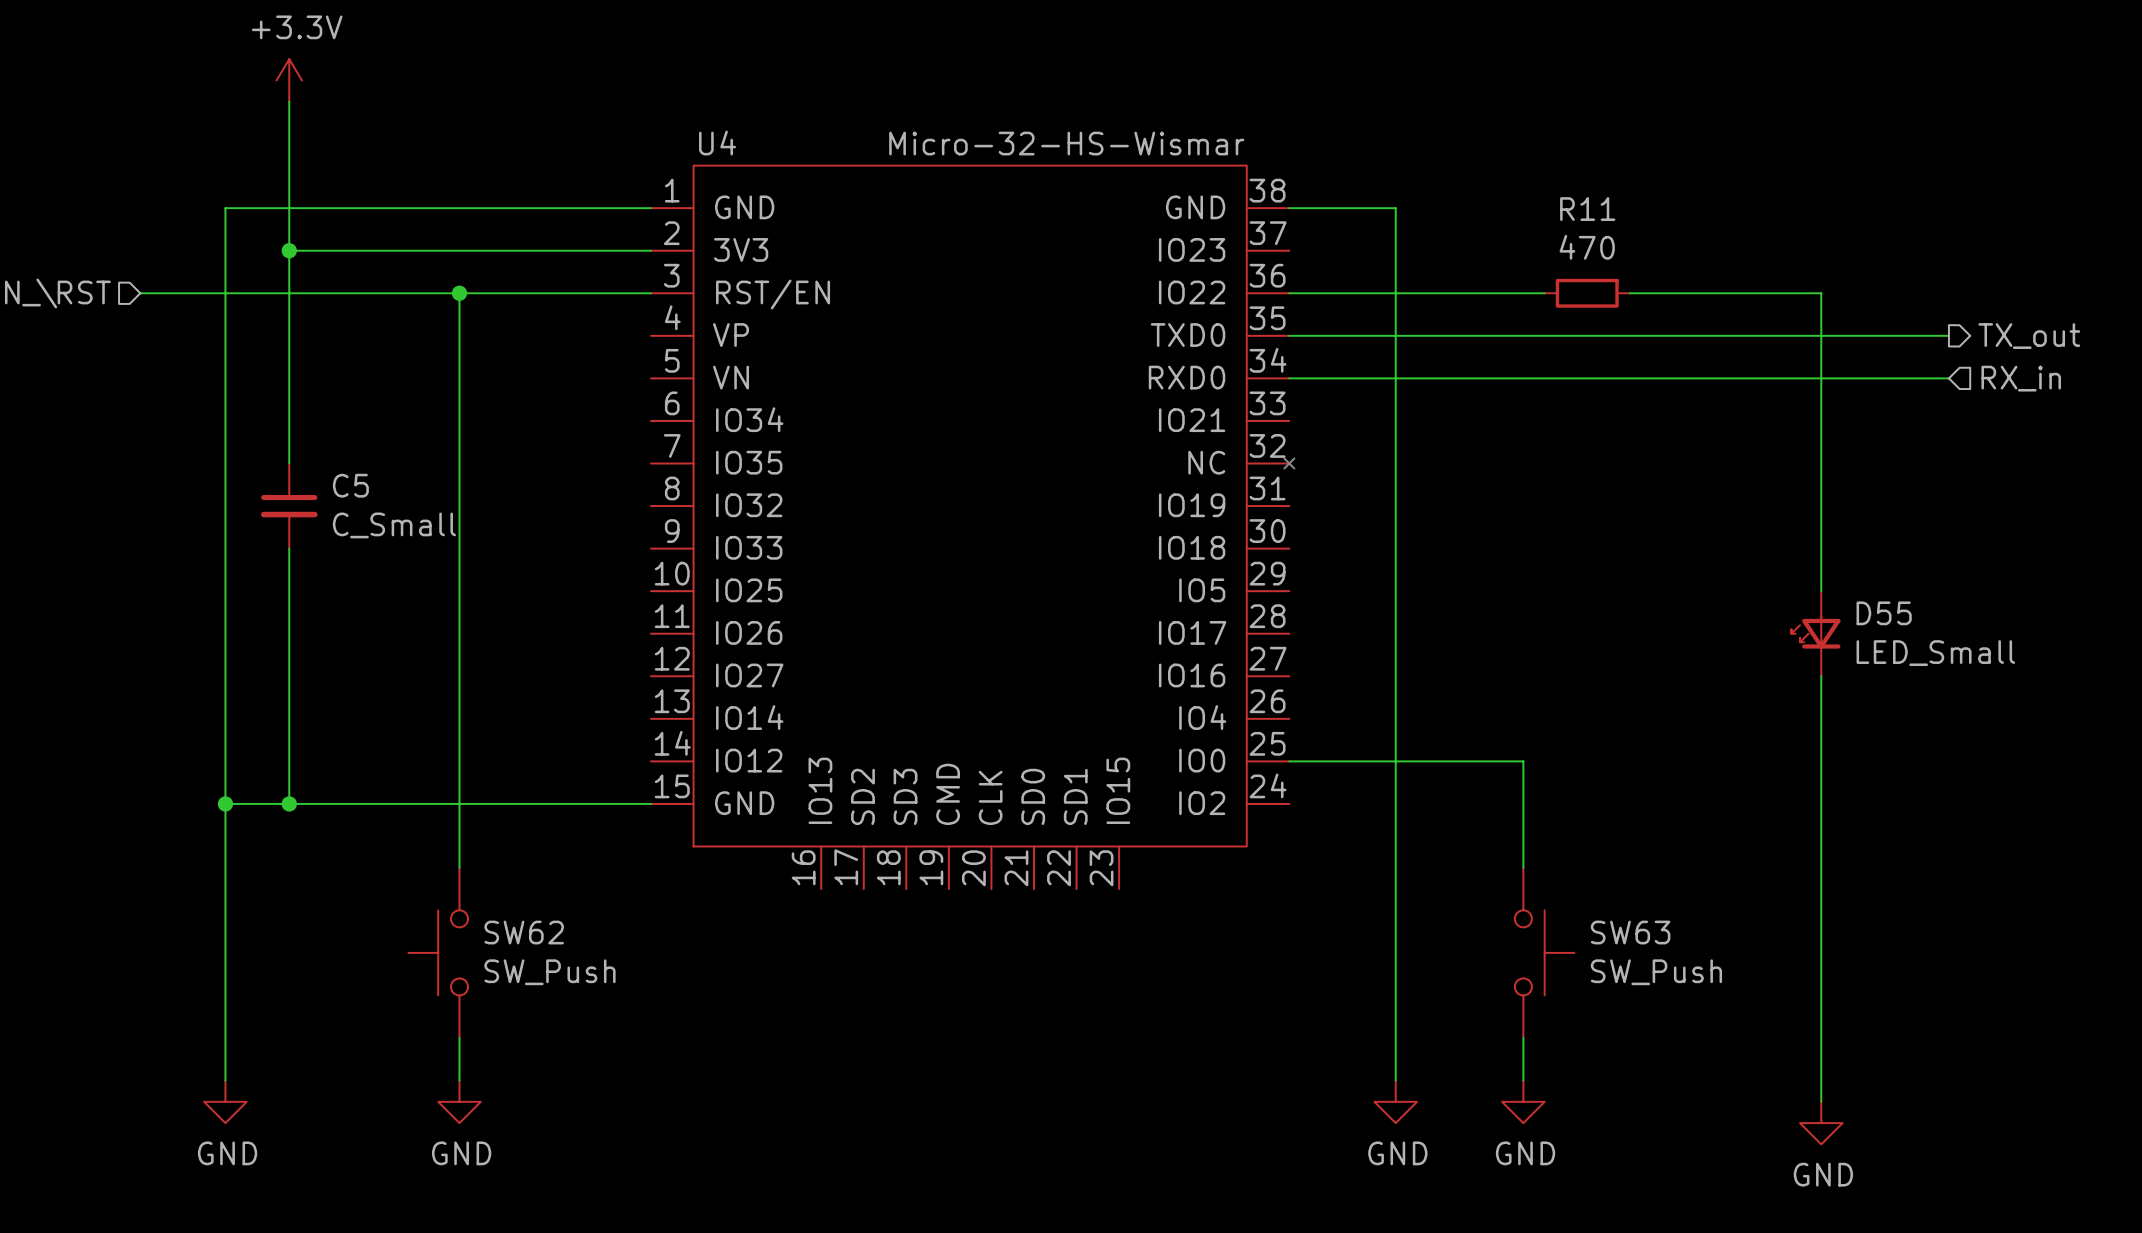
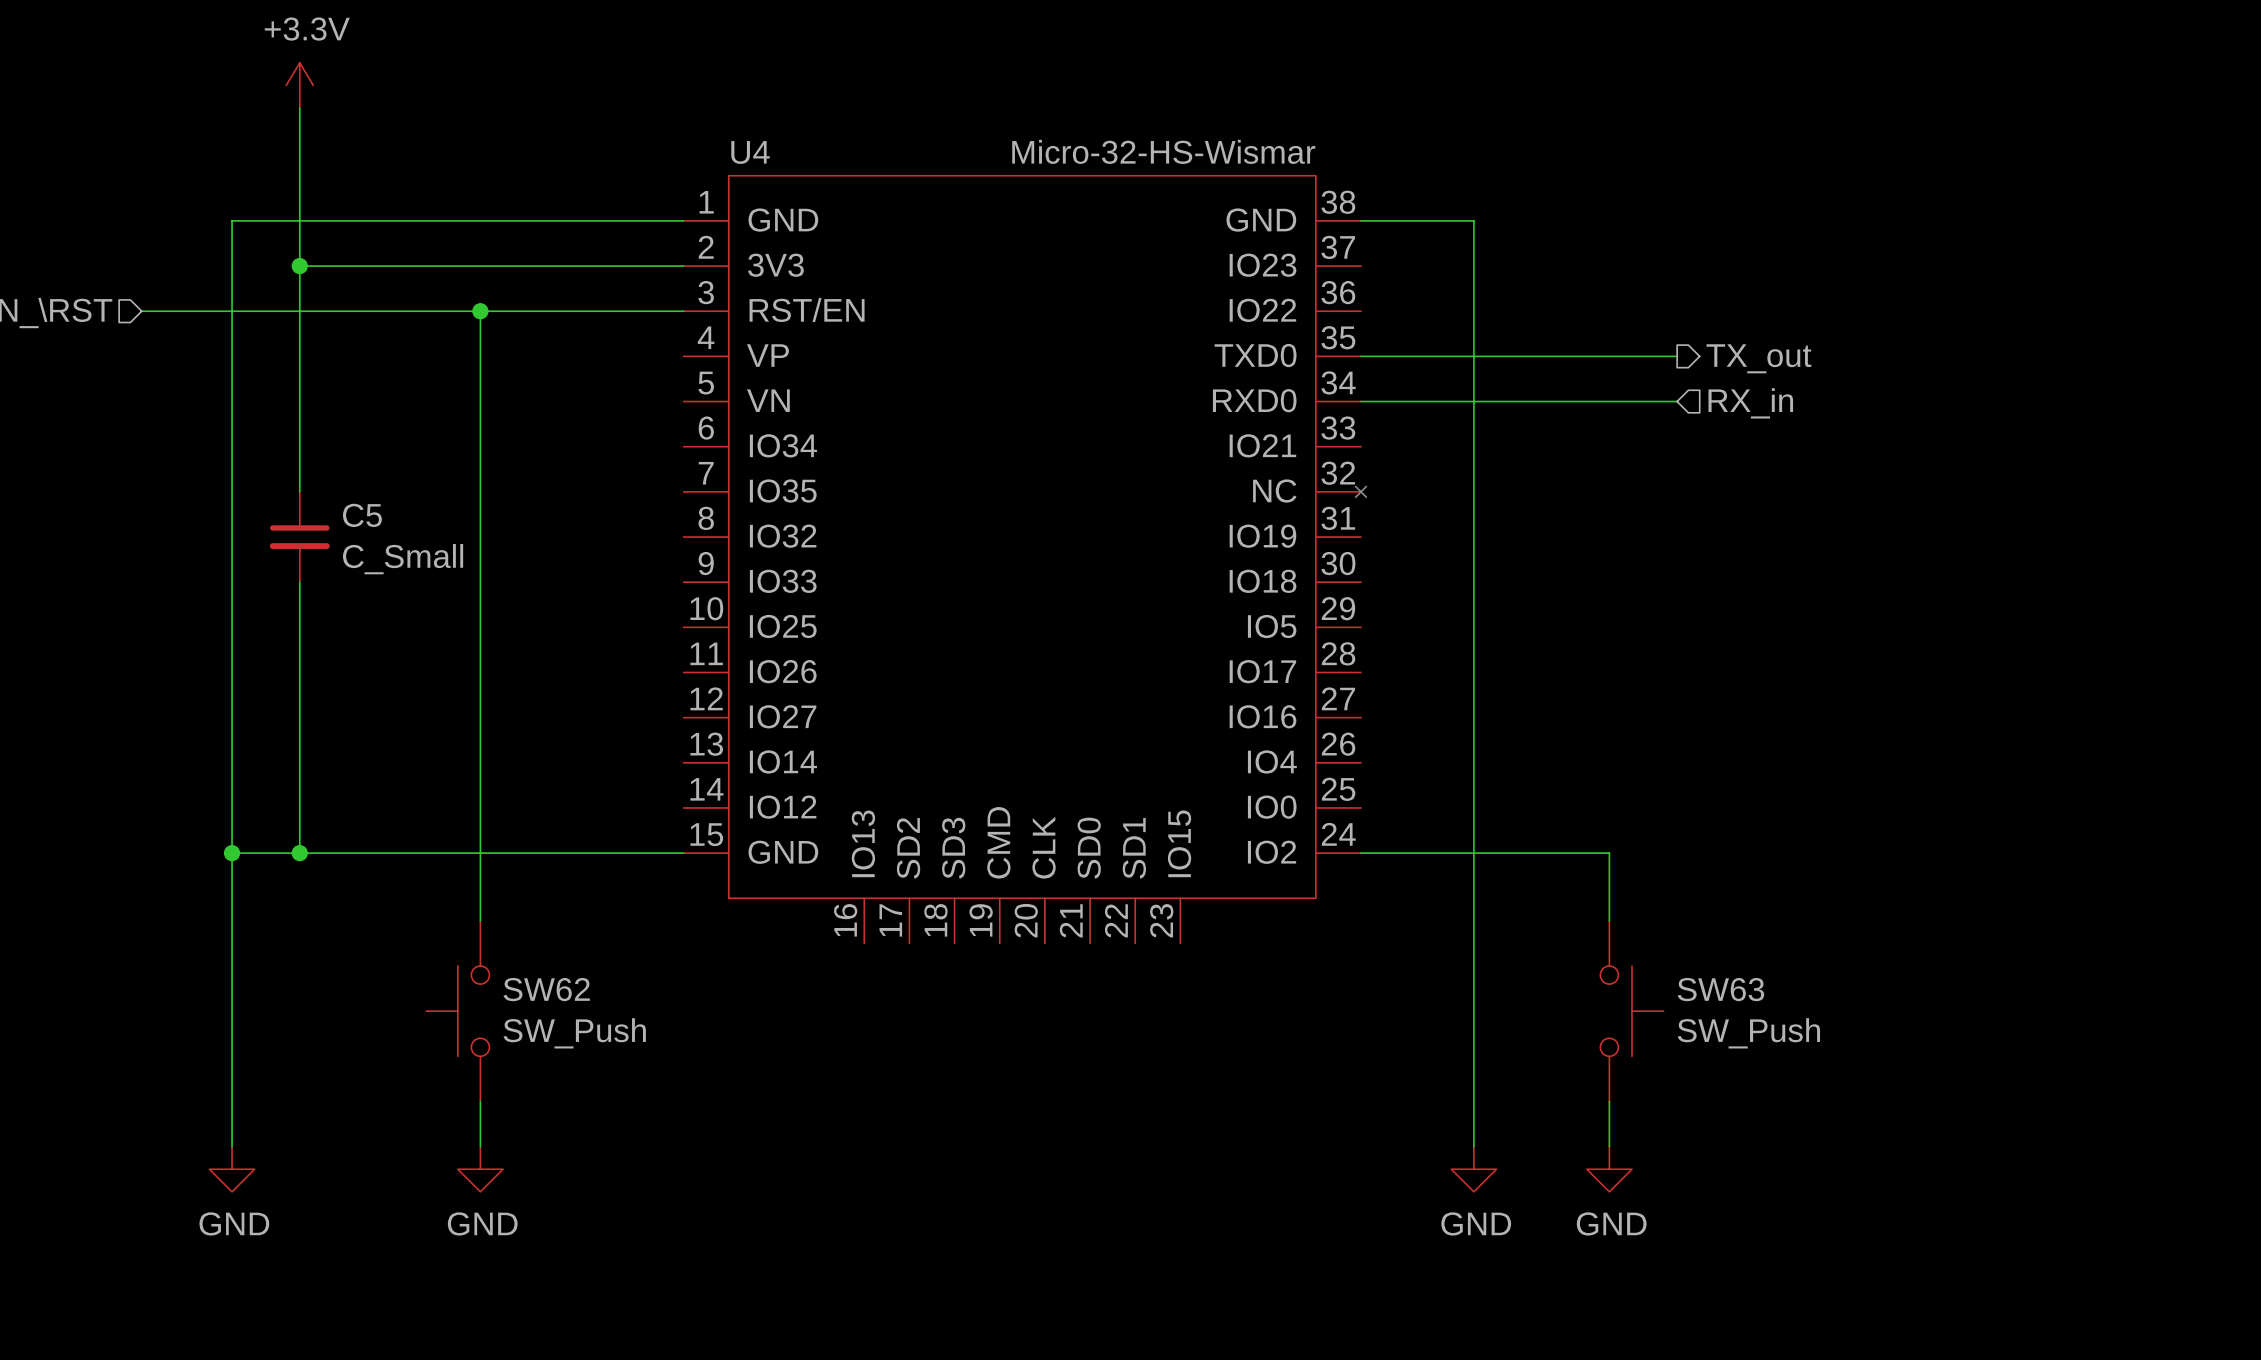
wire: (1289, 293) (1544, 293) -> none
R11: 470 (1587, 293) -> none
wire: (1629, 293) (1821, 293) (1821, 591) -> none
wire: (1587, 335) (1948, 335) -> none
hierarchical label position: TX_out (2029, 336) -> TX_out (1758, 358)
wire: (1587, 378) (1948, 378) -> none
hierarchical label position: RX_in (2021, 378) -> RX_in (1750, 403)
D55: LED_Small (1815, 633) -> none
wire: (1821, 676) (1821, 1101) -> none
wire: (1289, 761) (1523, 761) (1523, 803) -> (1361, 853) (1609, 853)
power symbol: GND (1821, 1123) -> none

